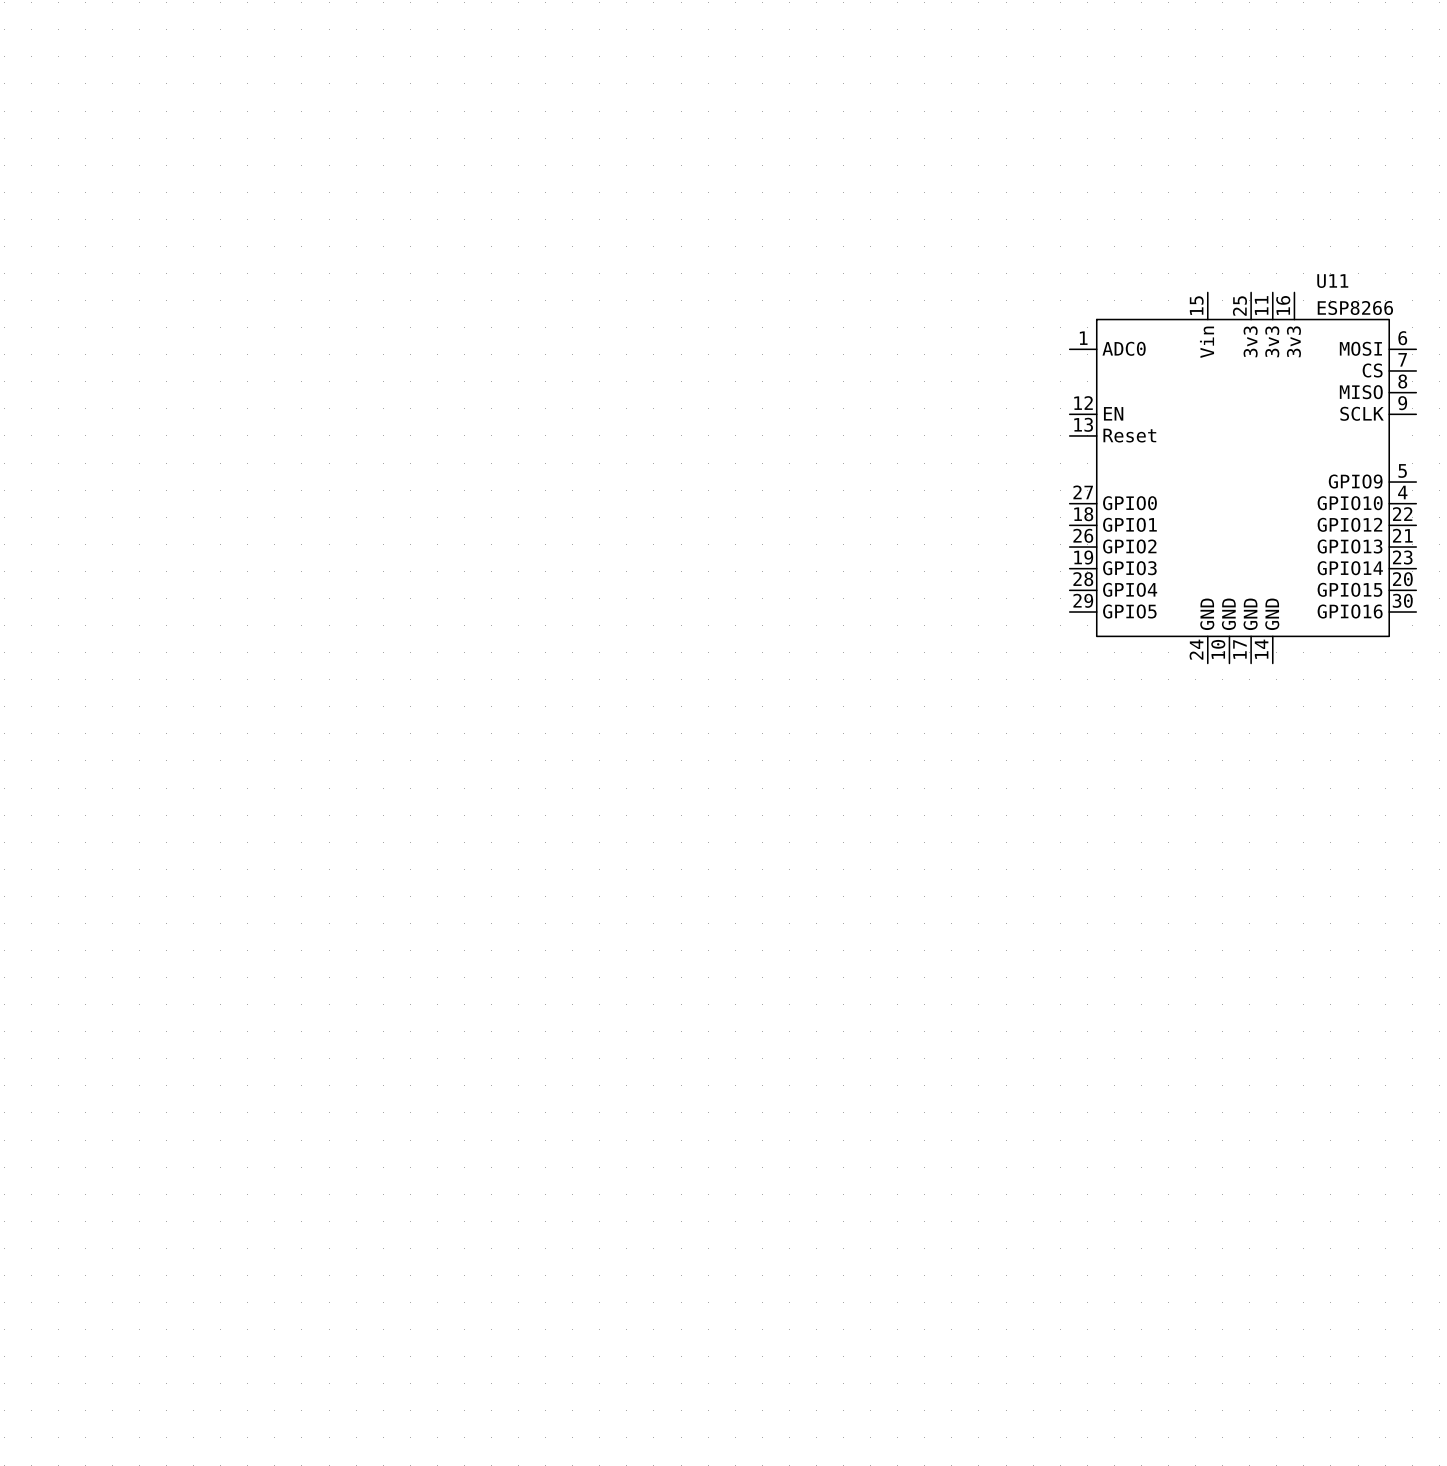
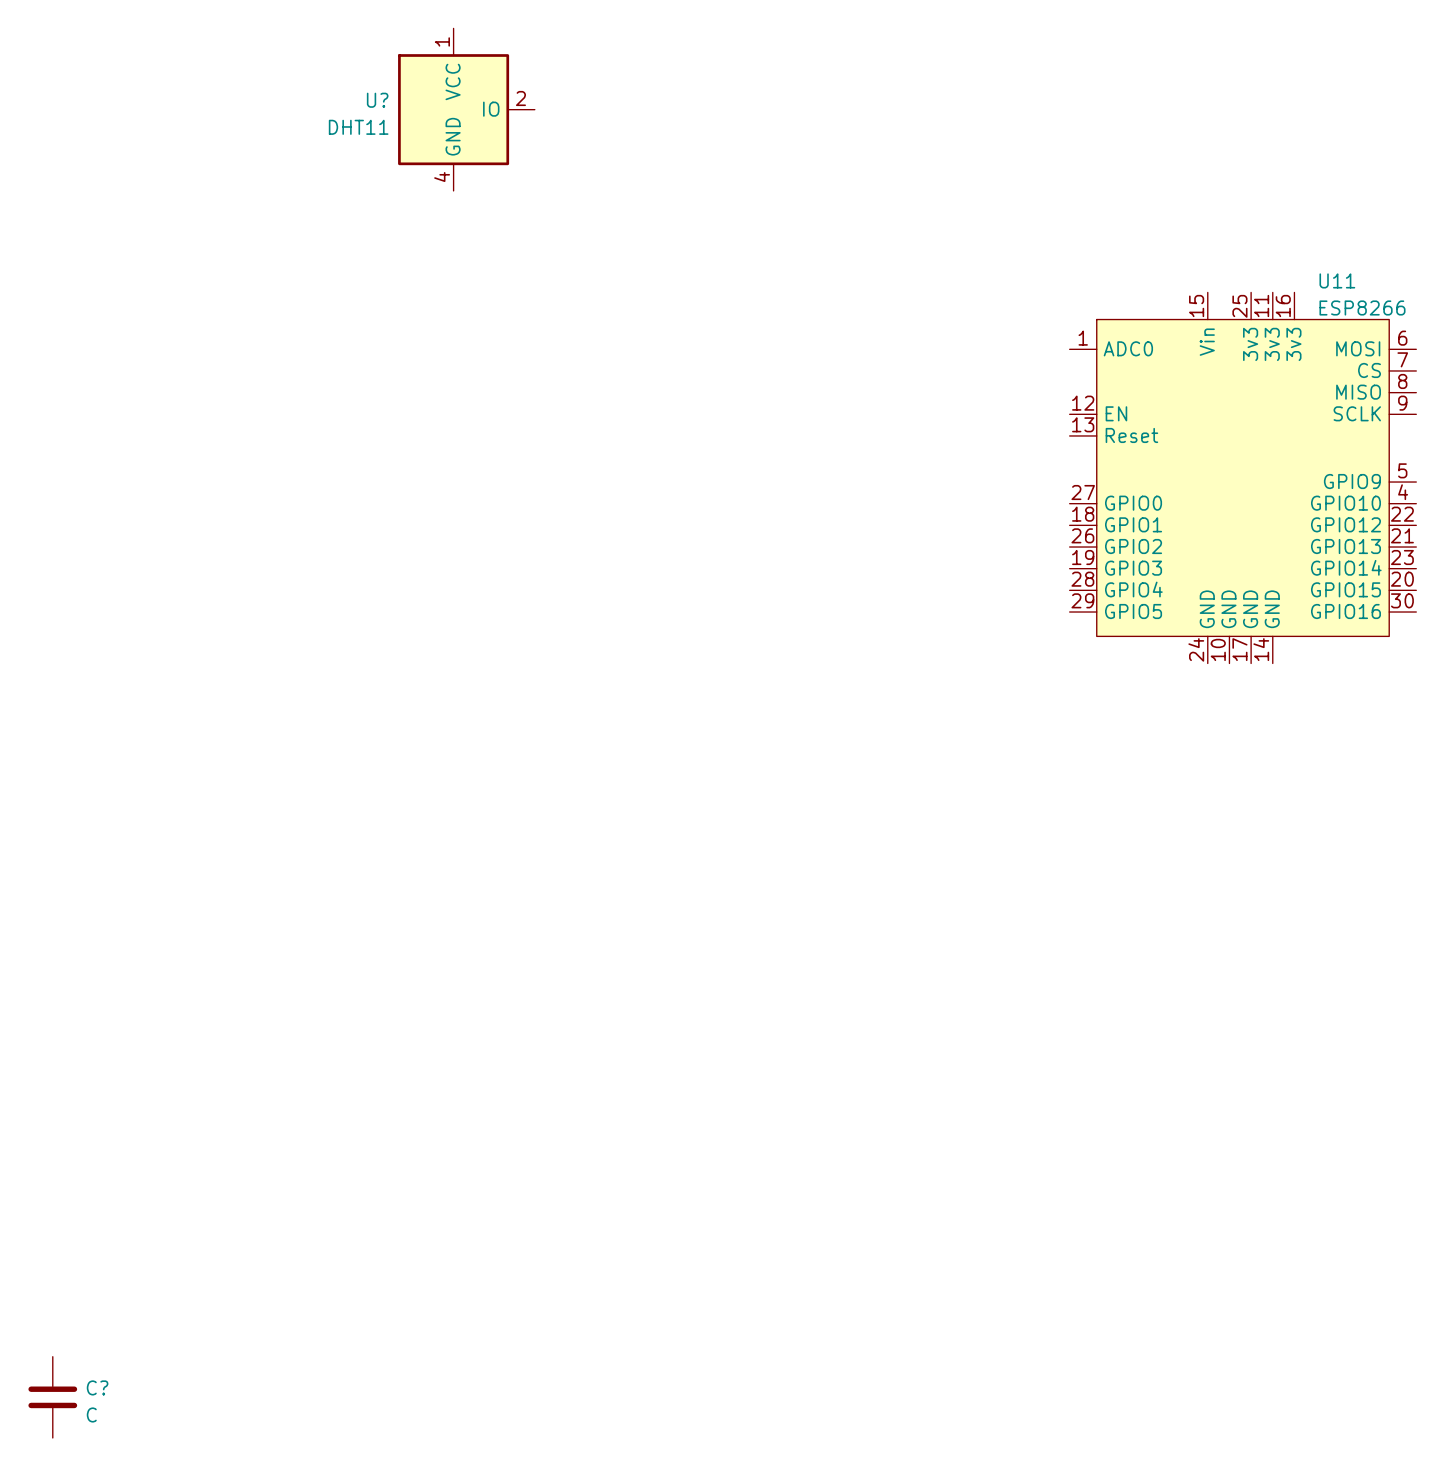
U?: none -> DHT11 (466, 109)
C?: none -> C (52, 1397)

